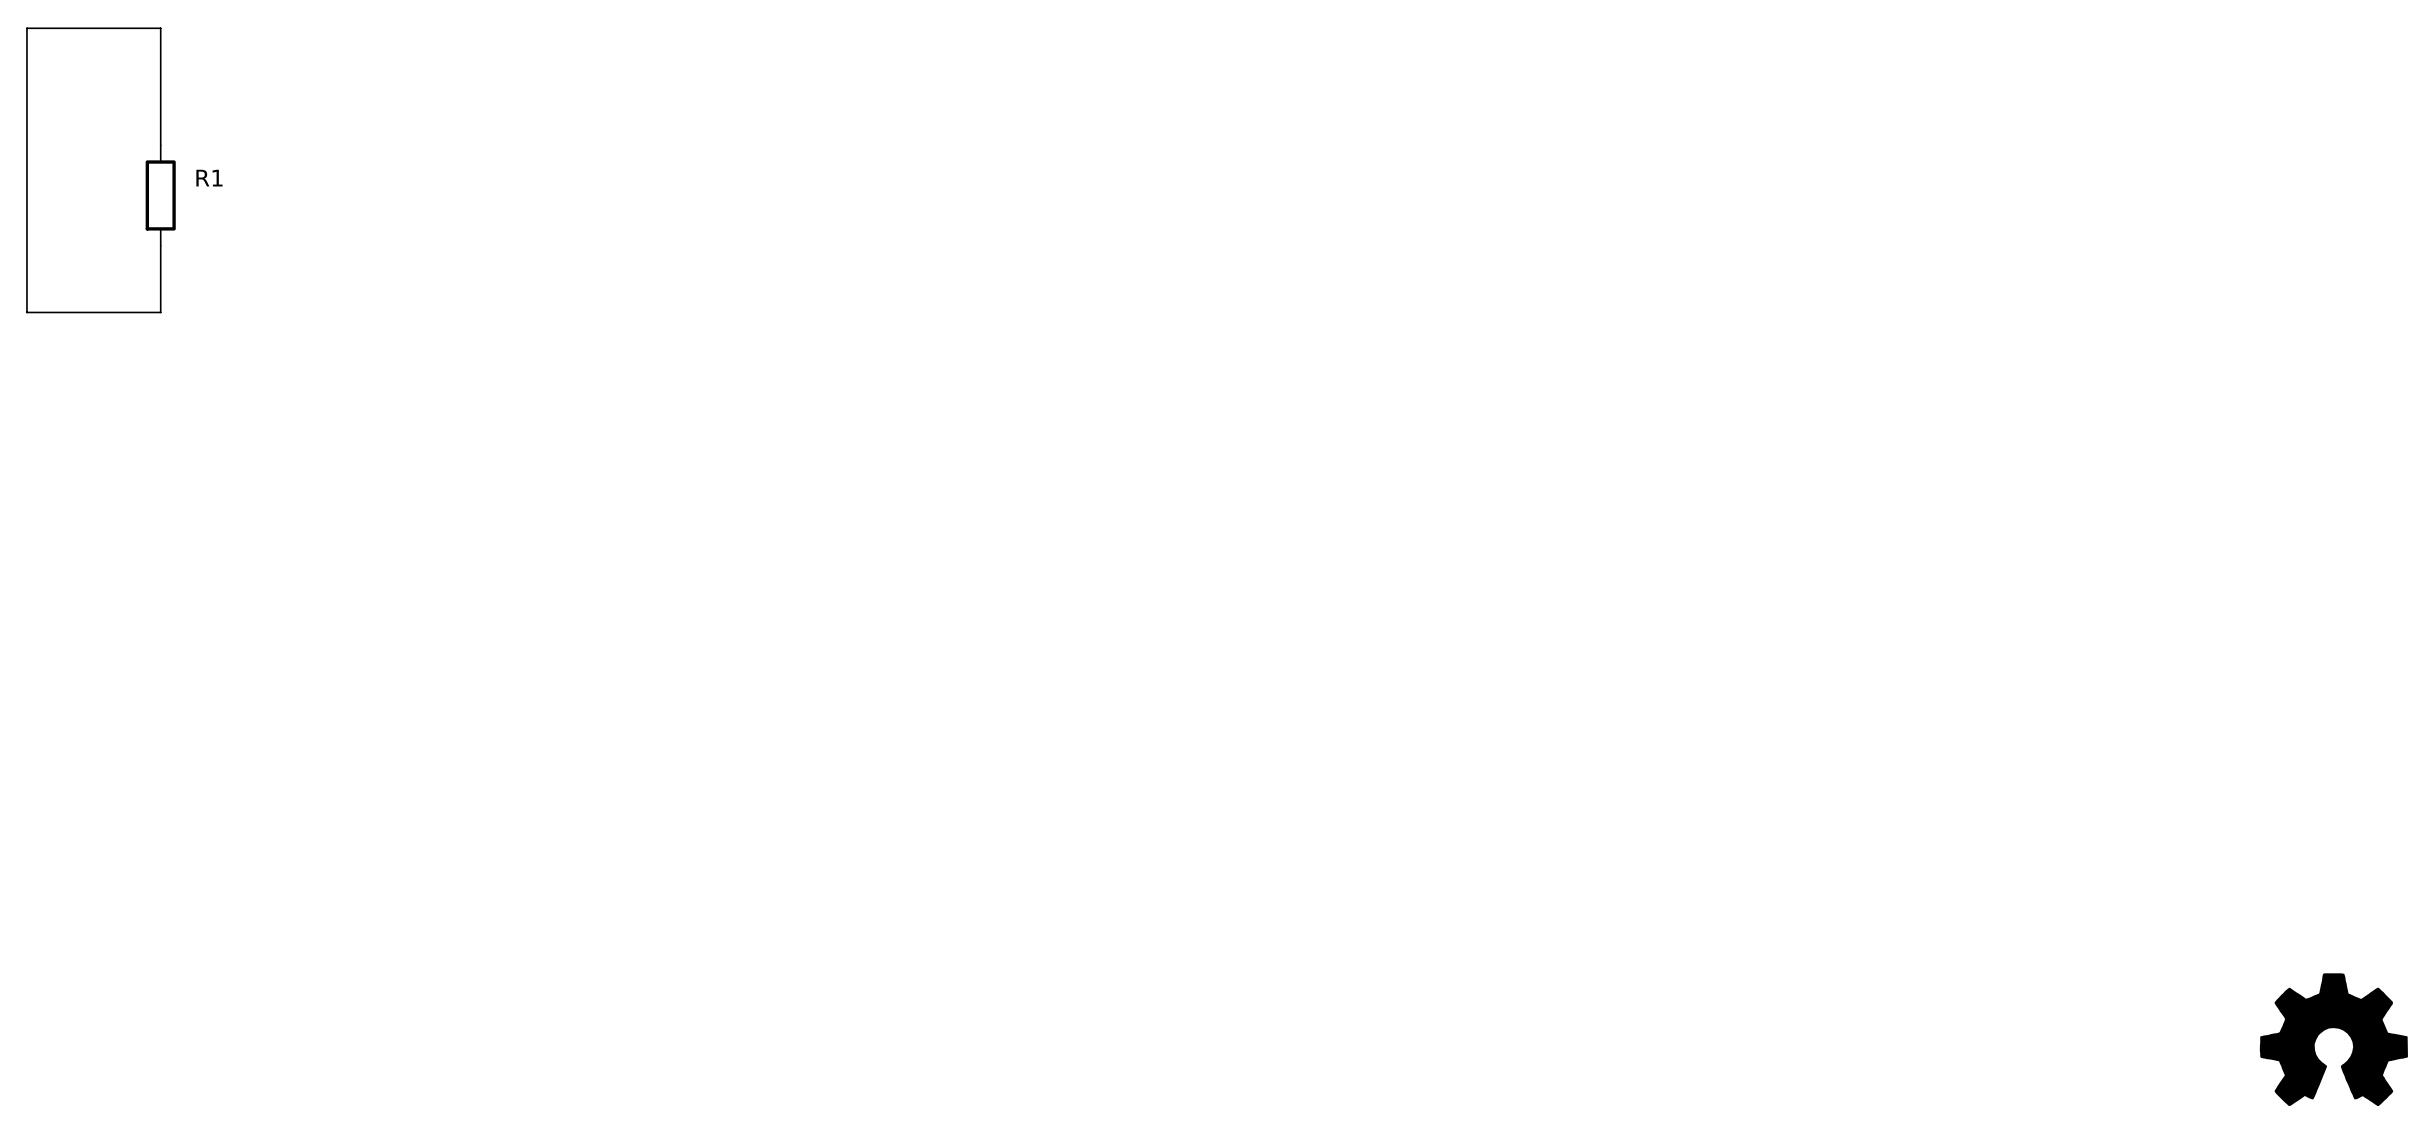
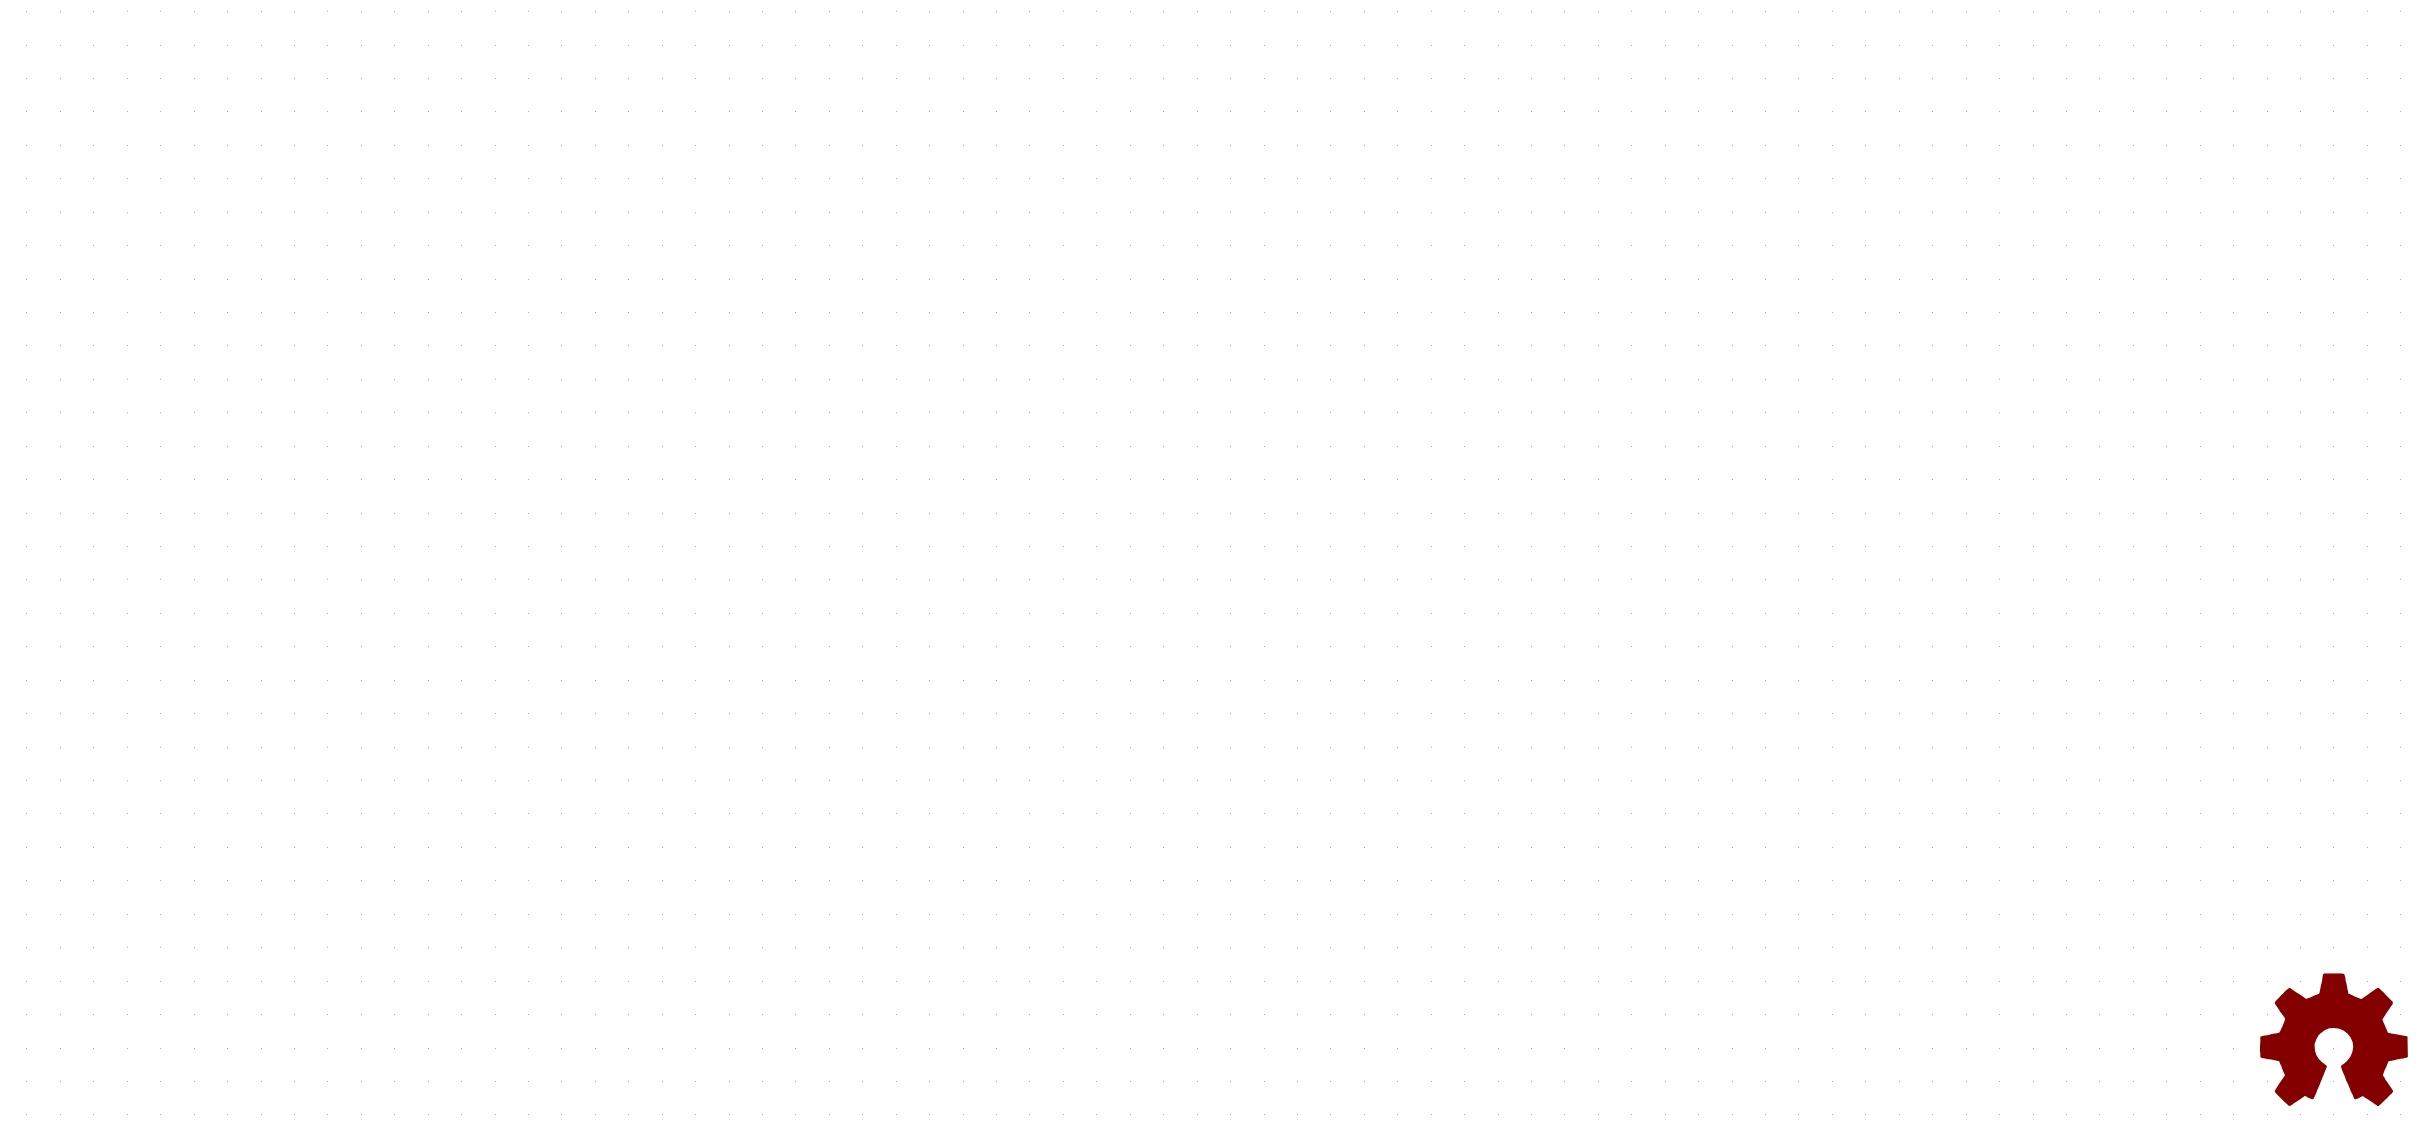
wire: (160, 145) (160, 28) (26, 28) (26, 312) (160, 312) (160, 245) -> none
R1: (160, 195) -> none

